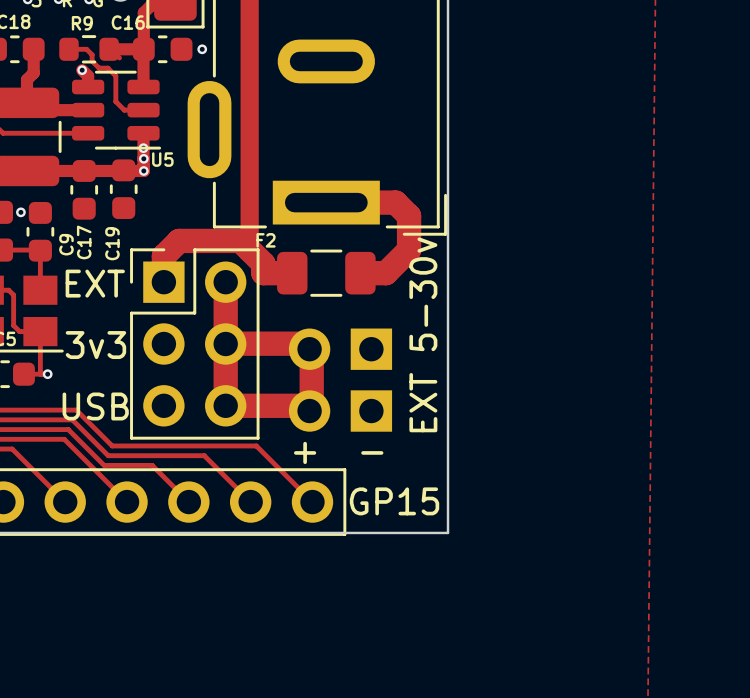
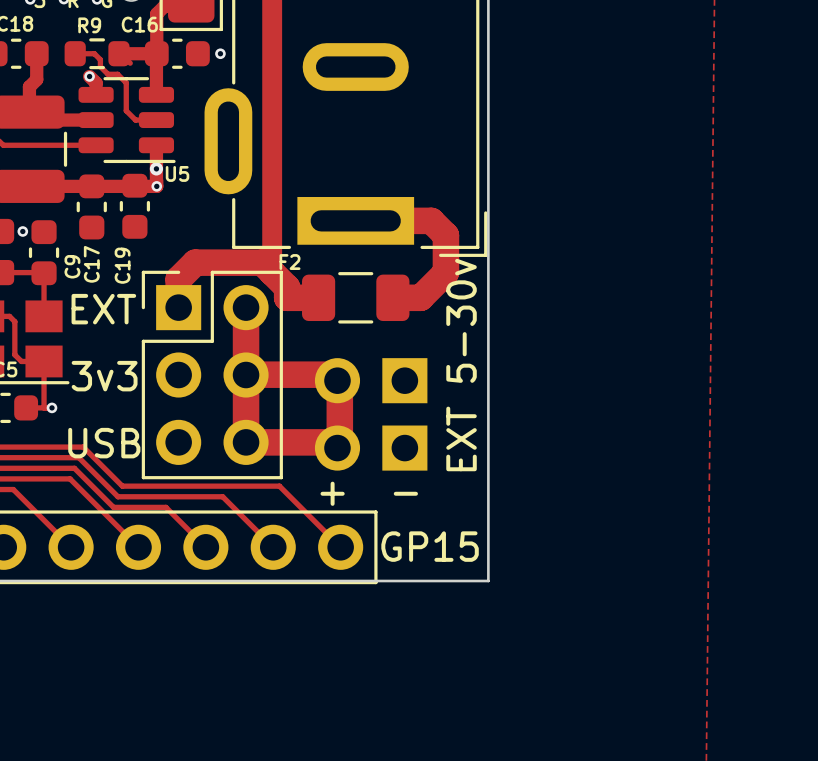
via: (143, 148) -> none
via: none -> (156, 168)
via: (143, 158) -> none

